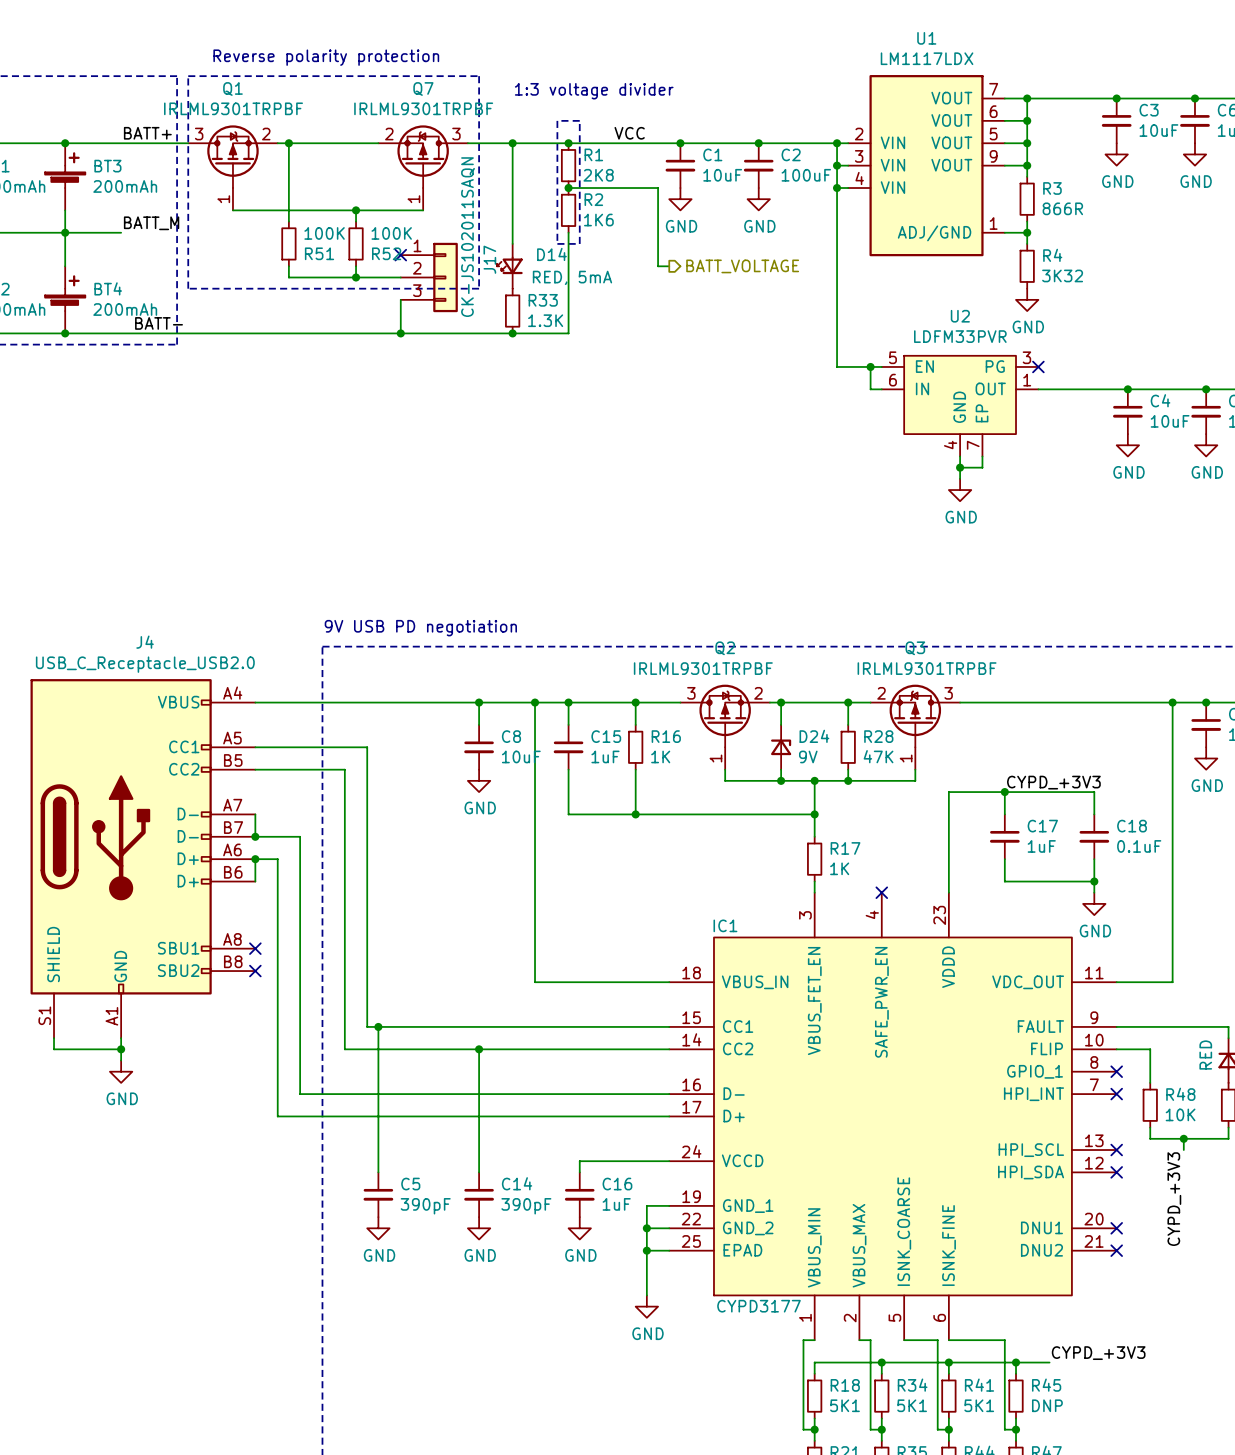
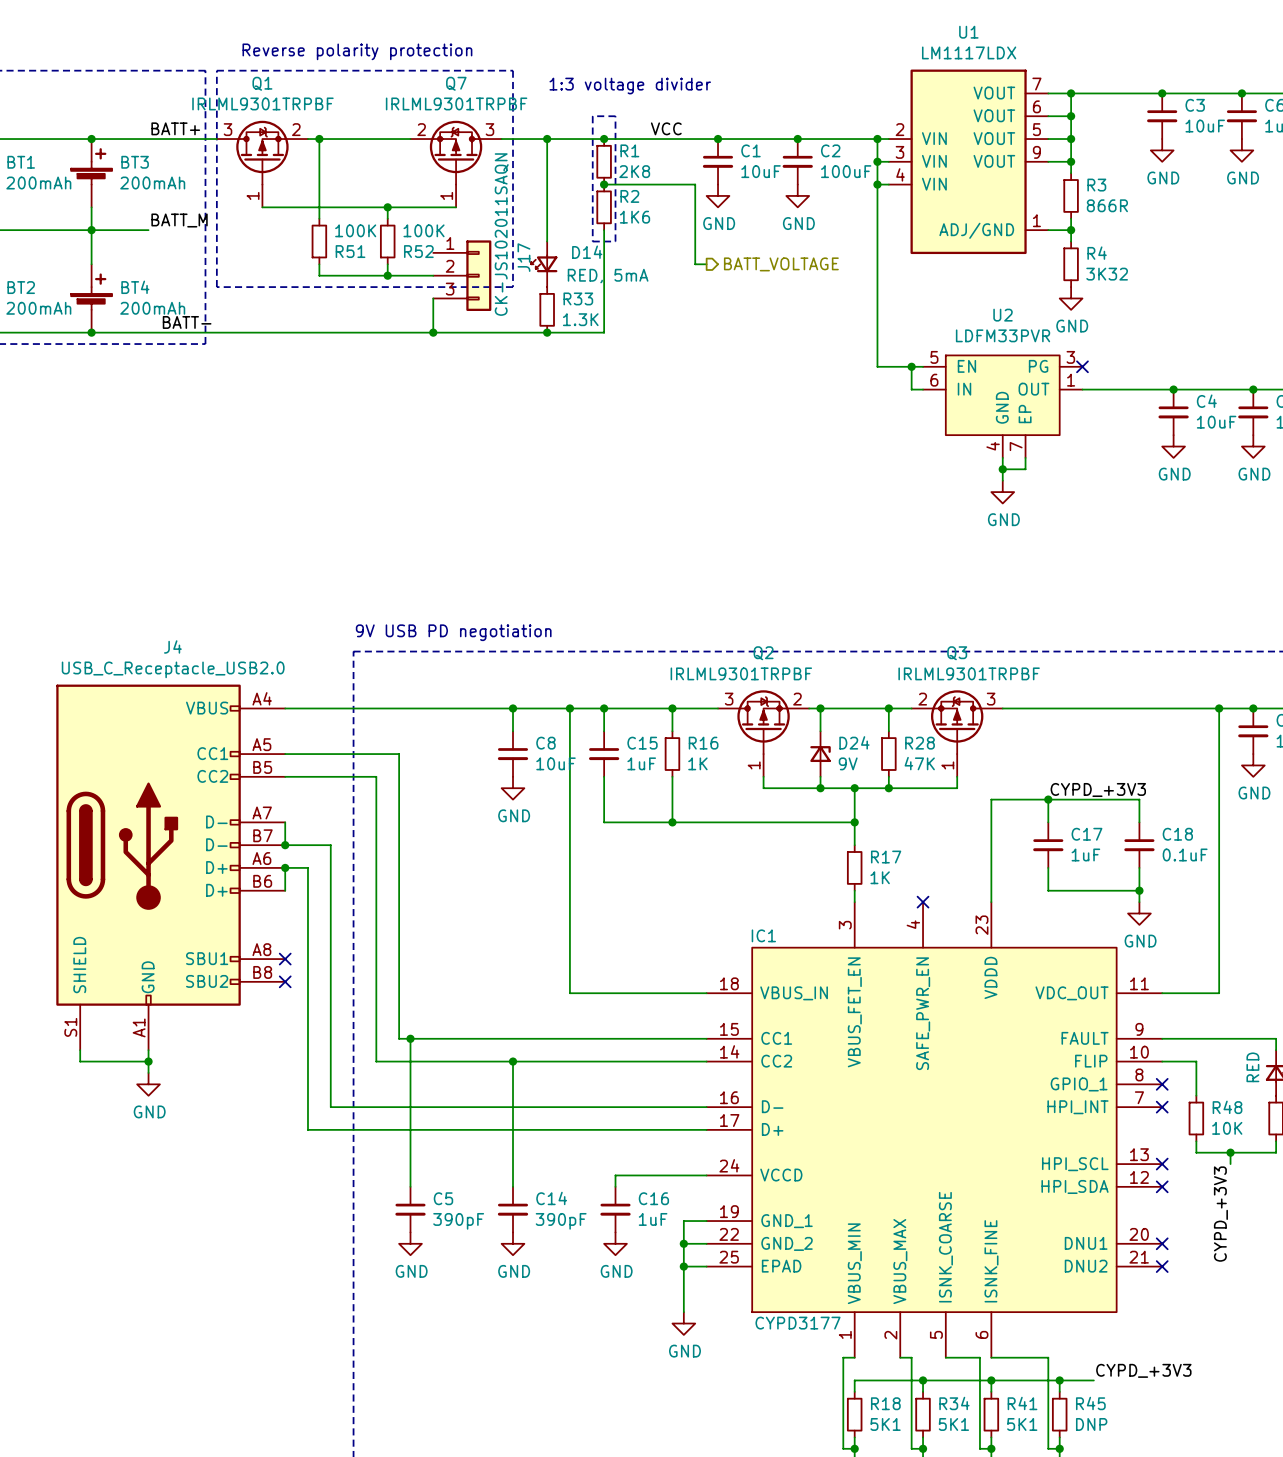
no-connect mark: (400, 255) -> none

